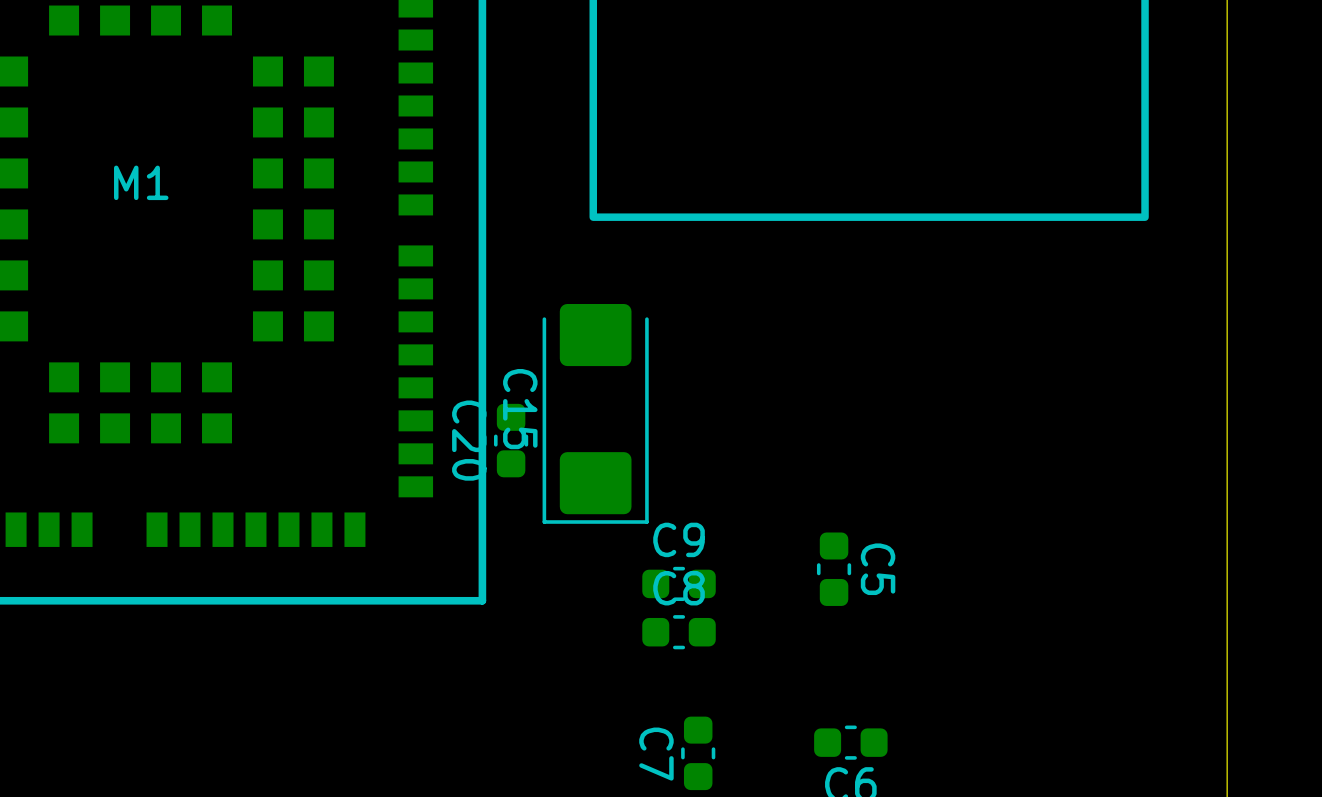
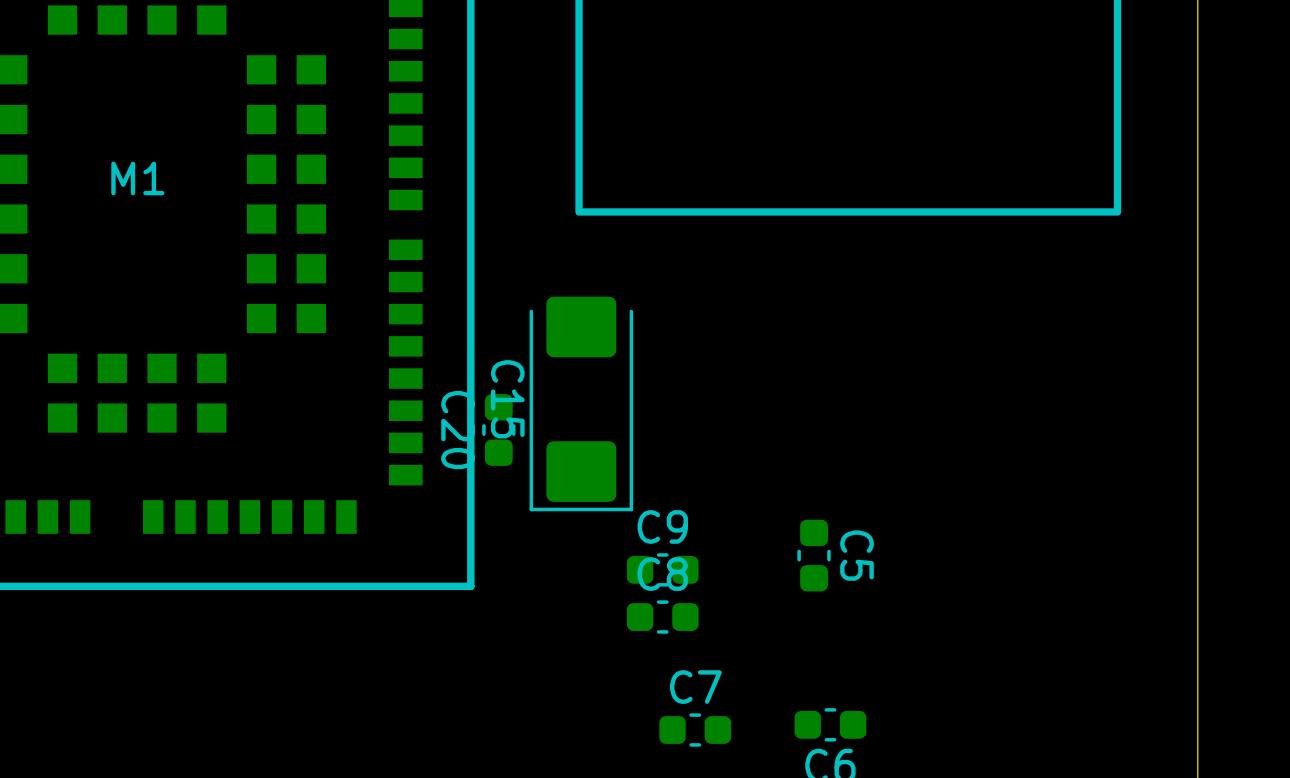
C7 rotation: 0° (698, 753) -> 90° clockwise (695, 730)

